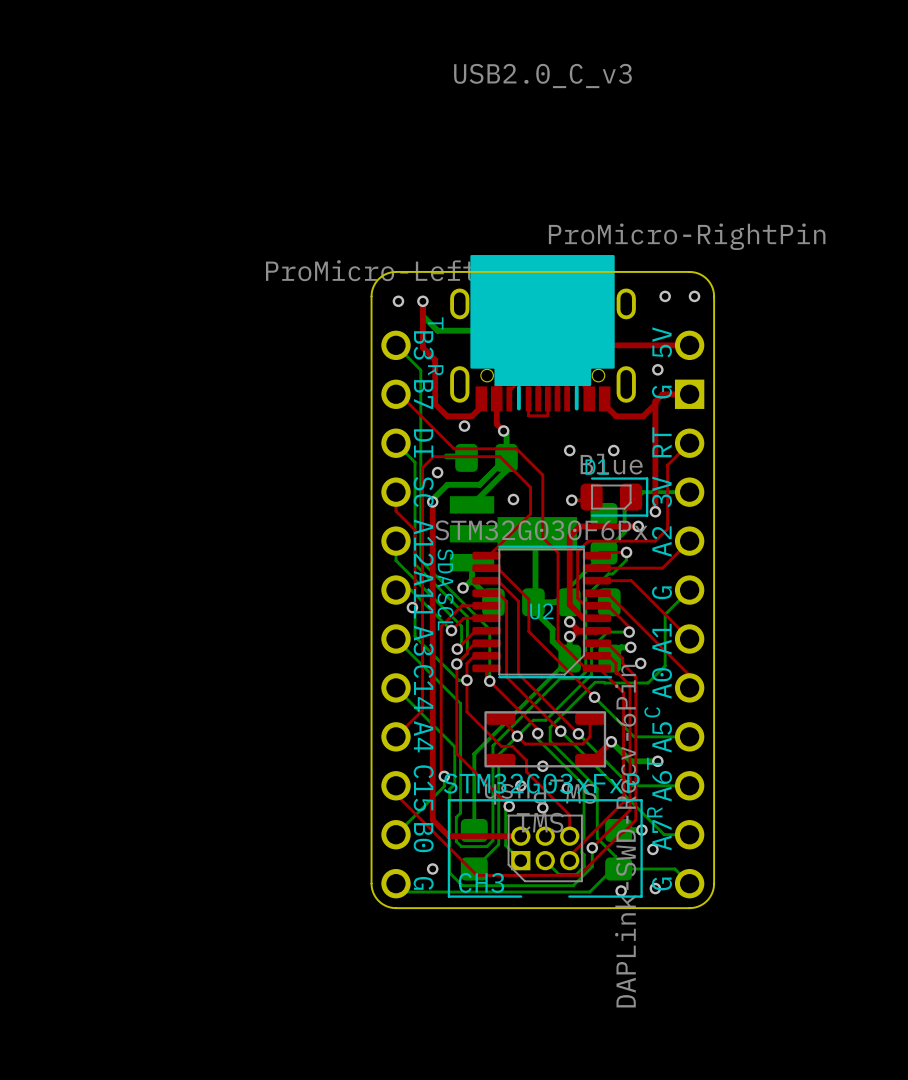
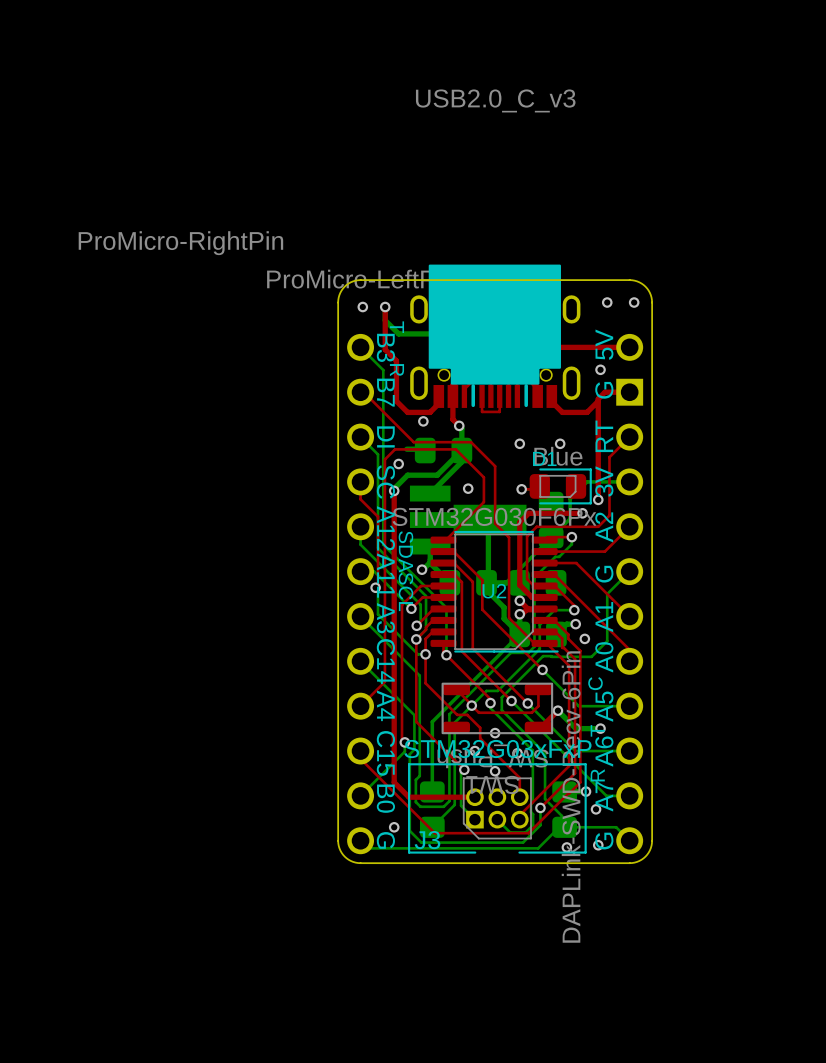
part value position: ProMicro-RightPin (687, 236) -> ProMicro-RightPin (180, 243)
CH3 name: CH3 (481, 882) -> J3 (427, 840)

